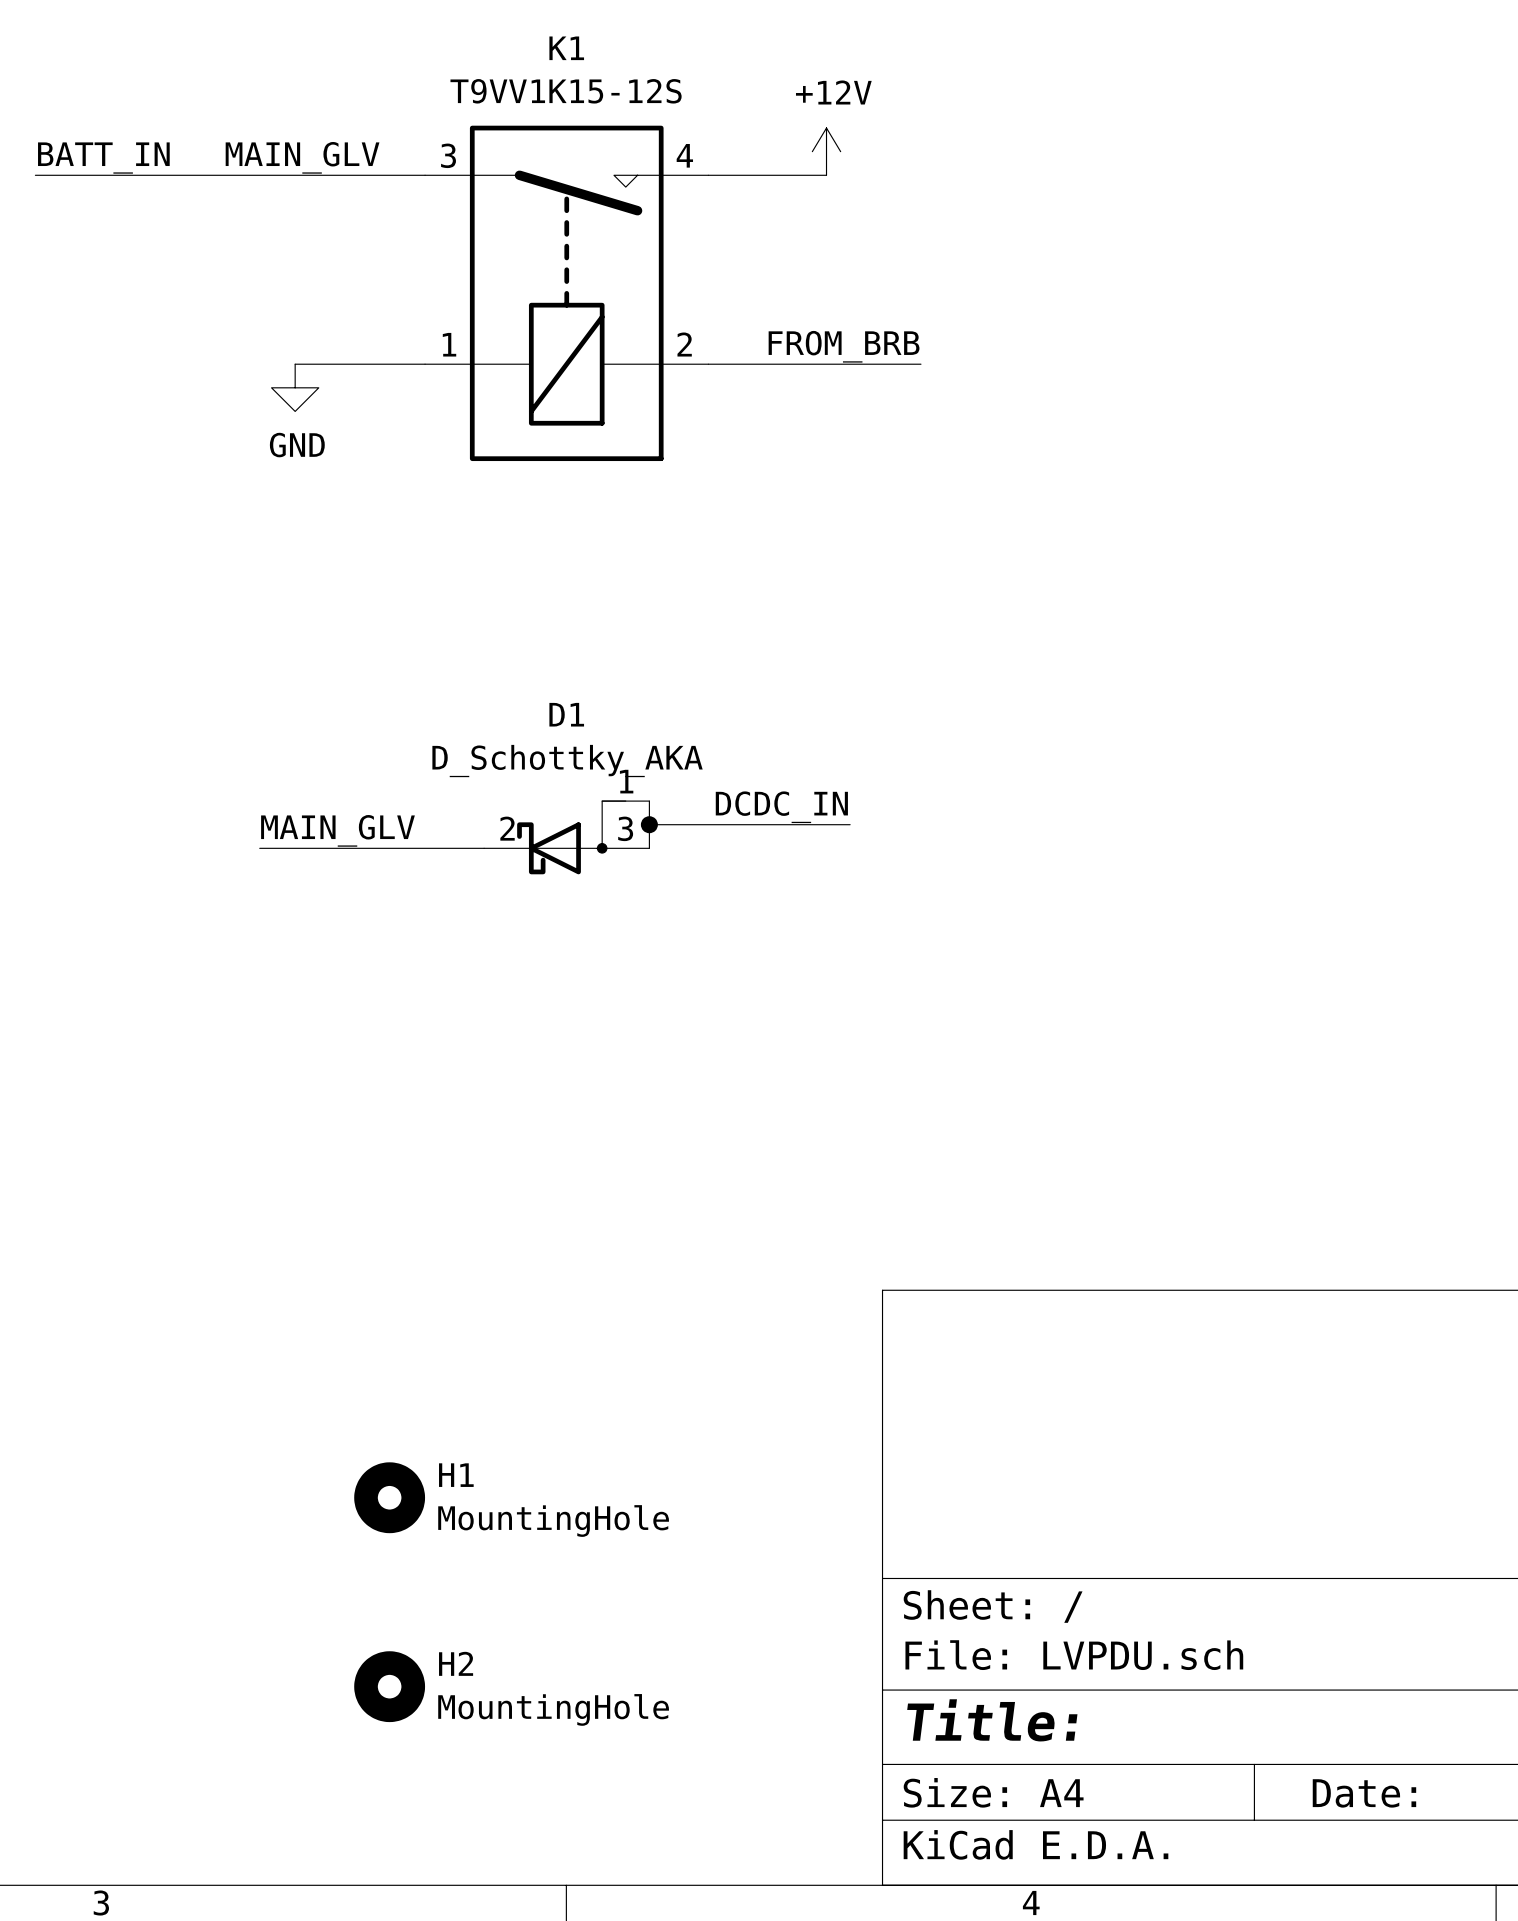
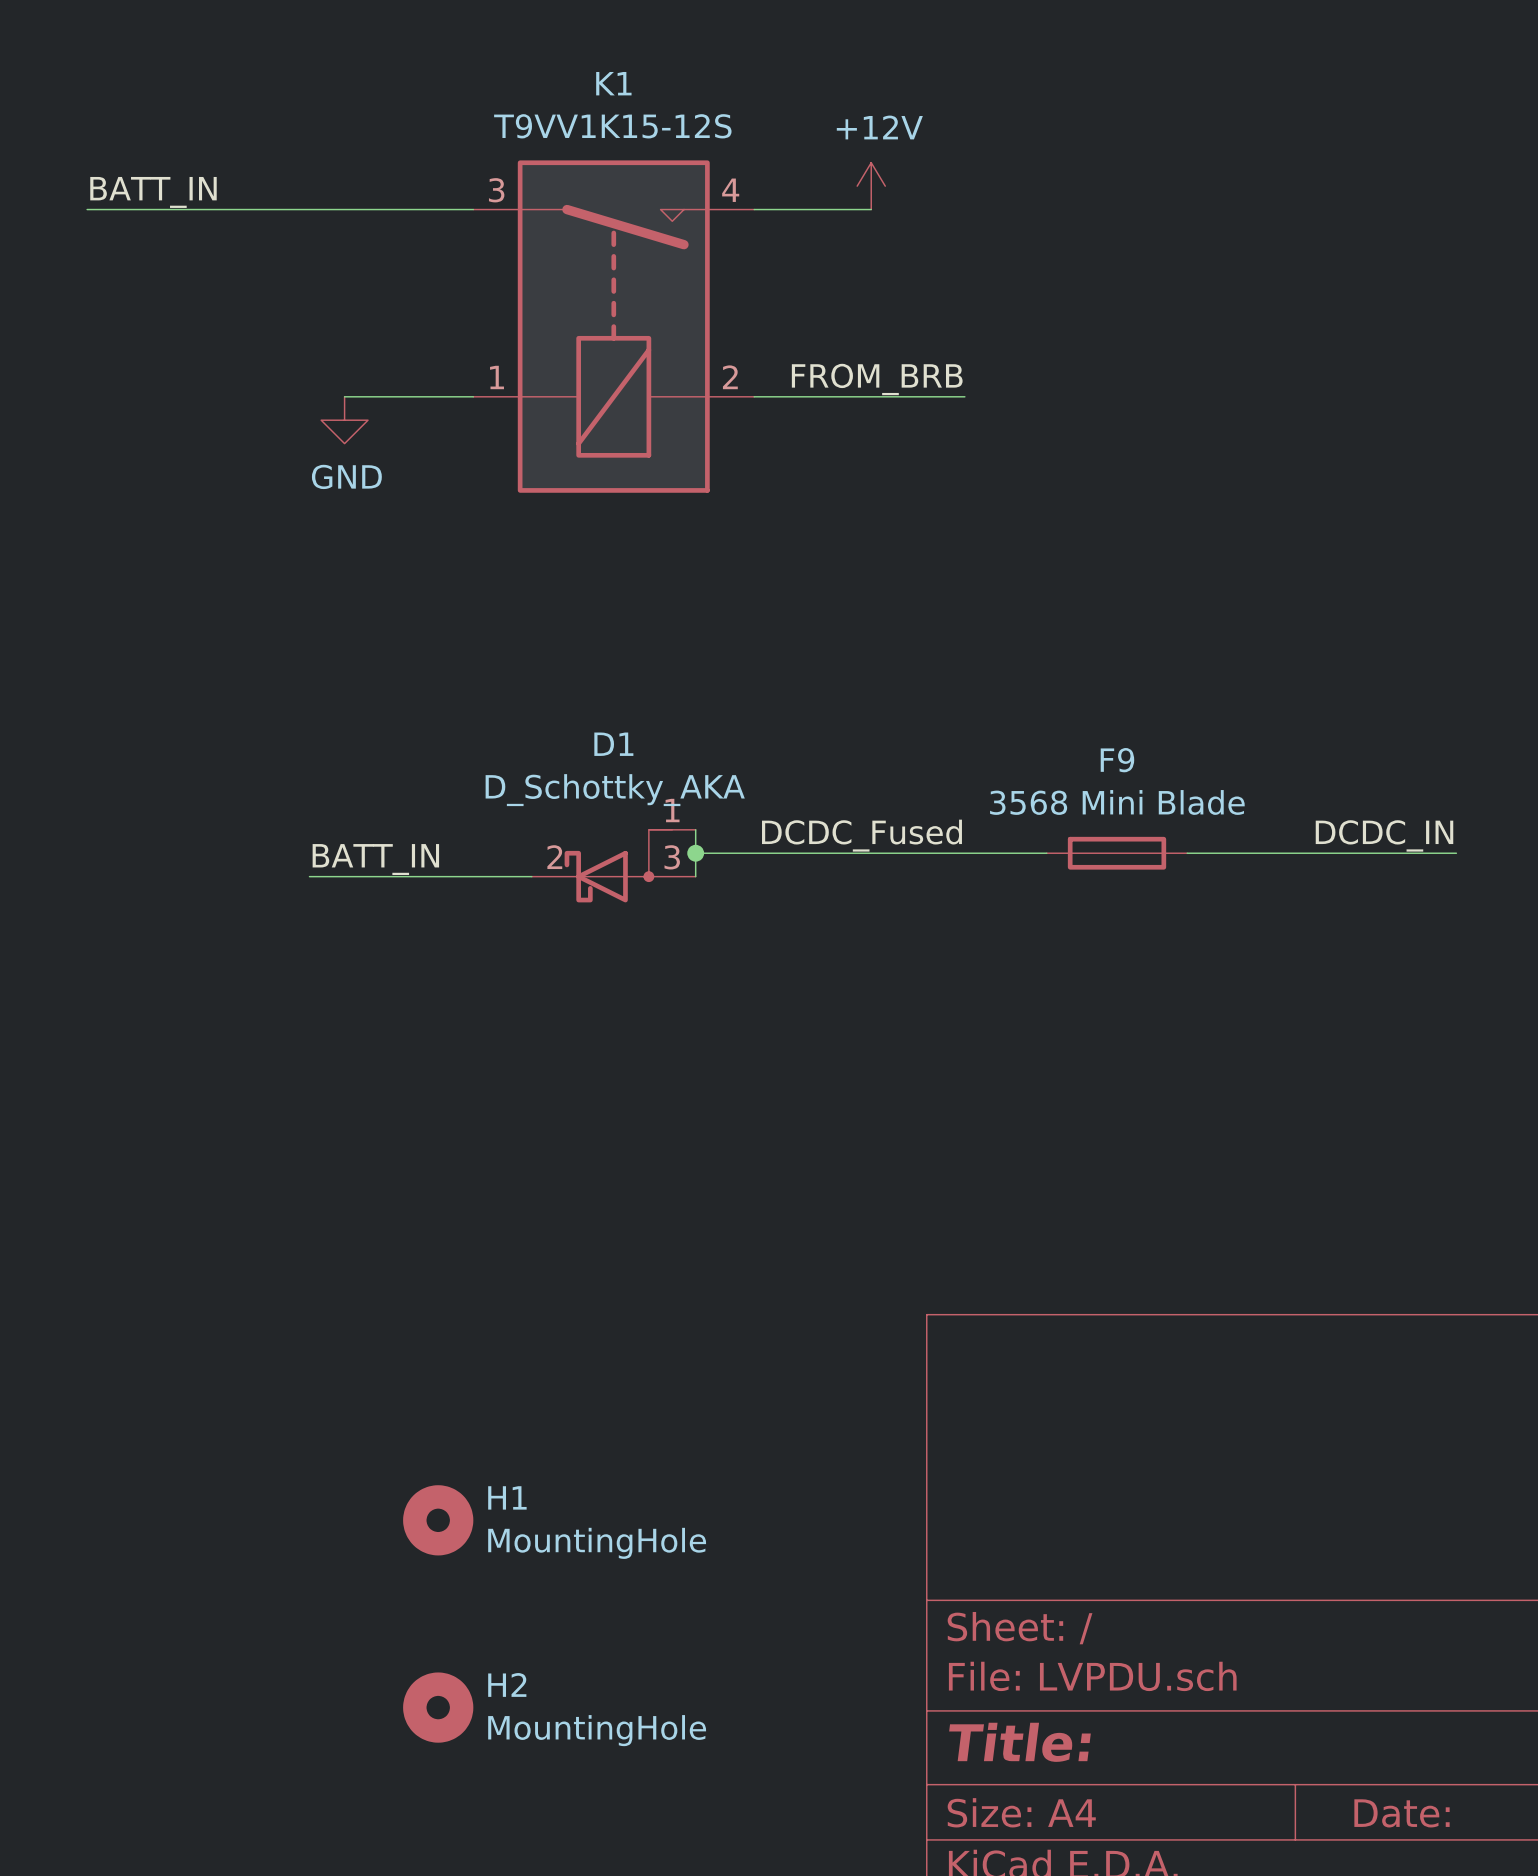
label: MAIN_GLV (302, 157) -> none
label: none -> DCDC_Fused (861, 835)
label: DCDC_IN (781, 807) -> none
label: none -> DCDC_IN (1384, 835)
wire: none -> (894, 853) (1046, 853)
F9: none -> 3568 Mini Blade (1117, 853)
wire: none -> (1187, 853) (1456, 853)
label: MAIN_GLV (337, 830) -> BATT_IN (375, 859)

